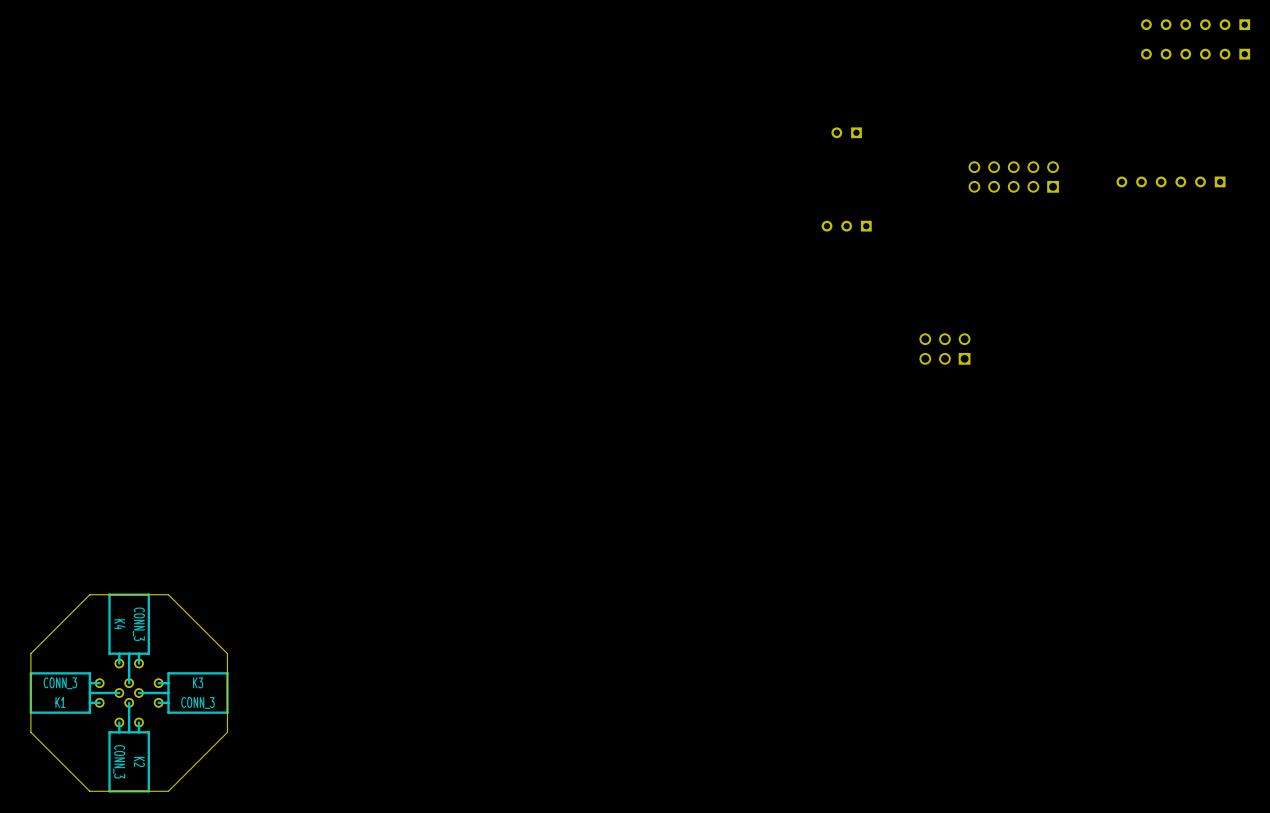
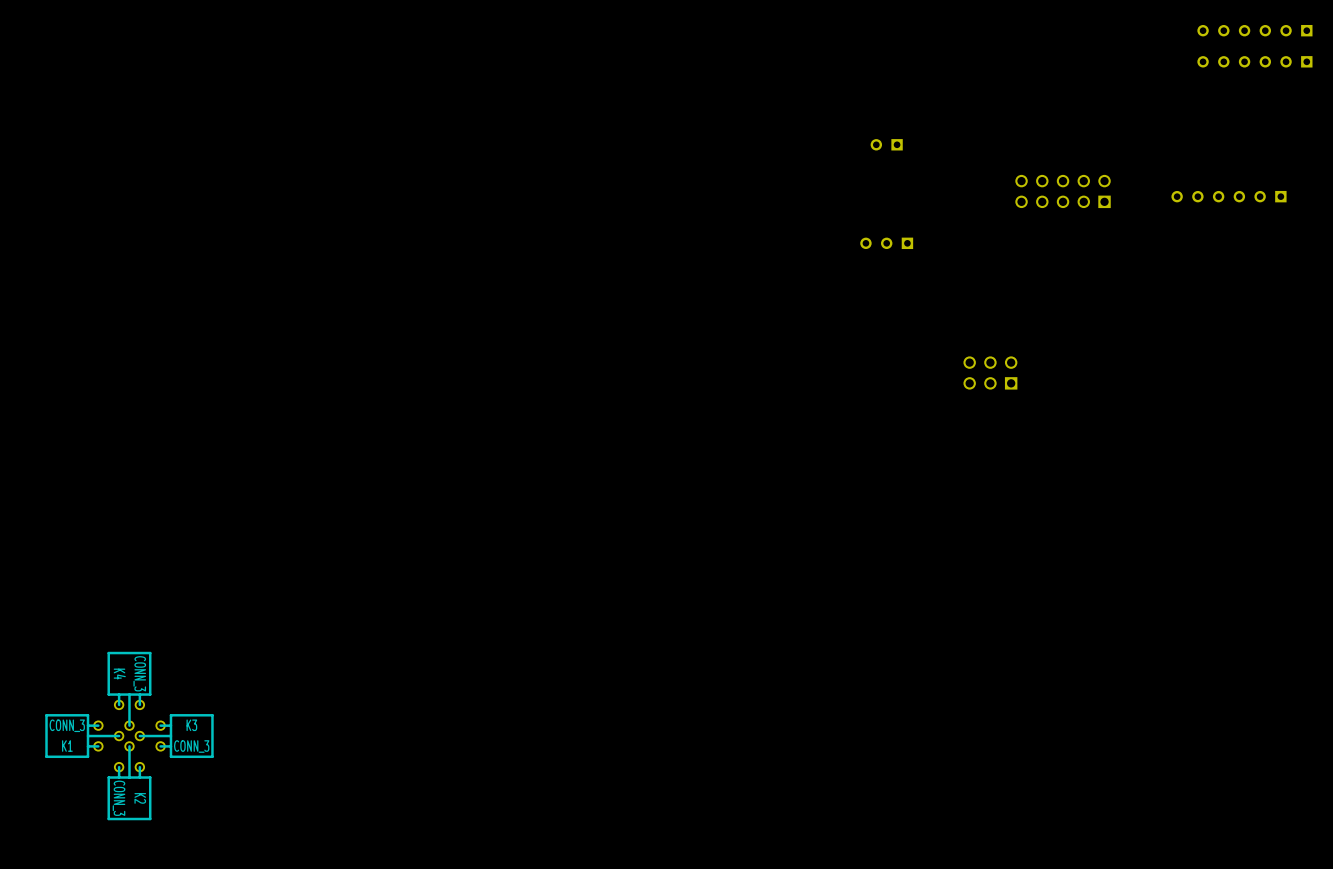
K4 footprint: [108, 593, 151, 689] -> [107, 651, 152, 731]
board edge: (168, 594) (89, 594) (30, 653) (30, 732) (89, 791) (168, 791) (227, 732) (227, 653) (168, 594) -> none
K1 footprint: [29, 672, 125, 714] -> [45, 714, 125, 759]
K3 footprint: [134, 672, 229, 714] -> [134, 714, 214, 759]
K2 footprint: [108, 697, 151, 793] -> [107, 741, 152, 821]

